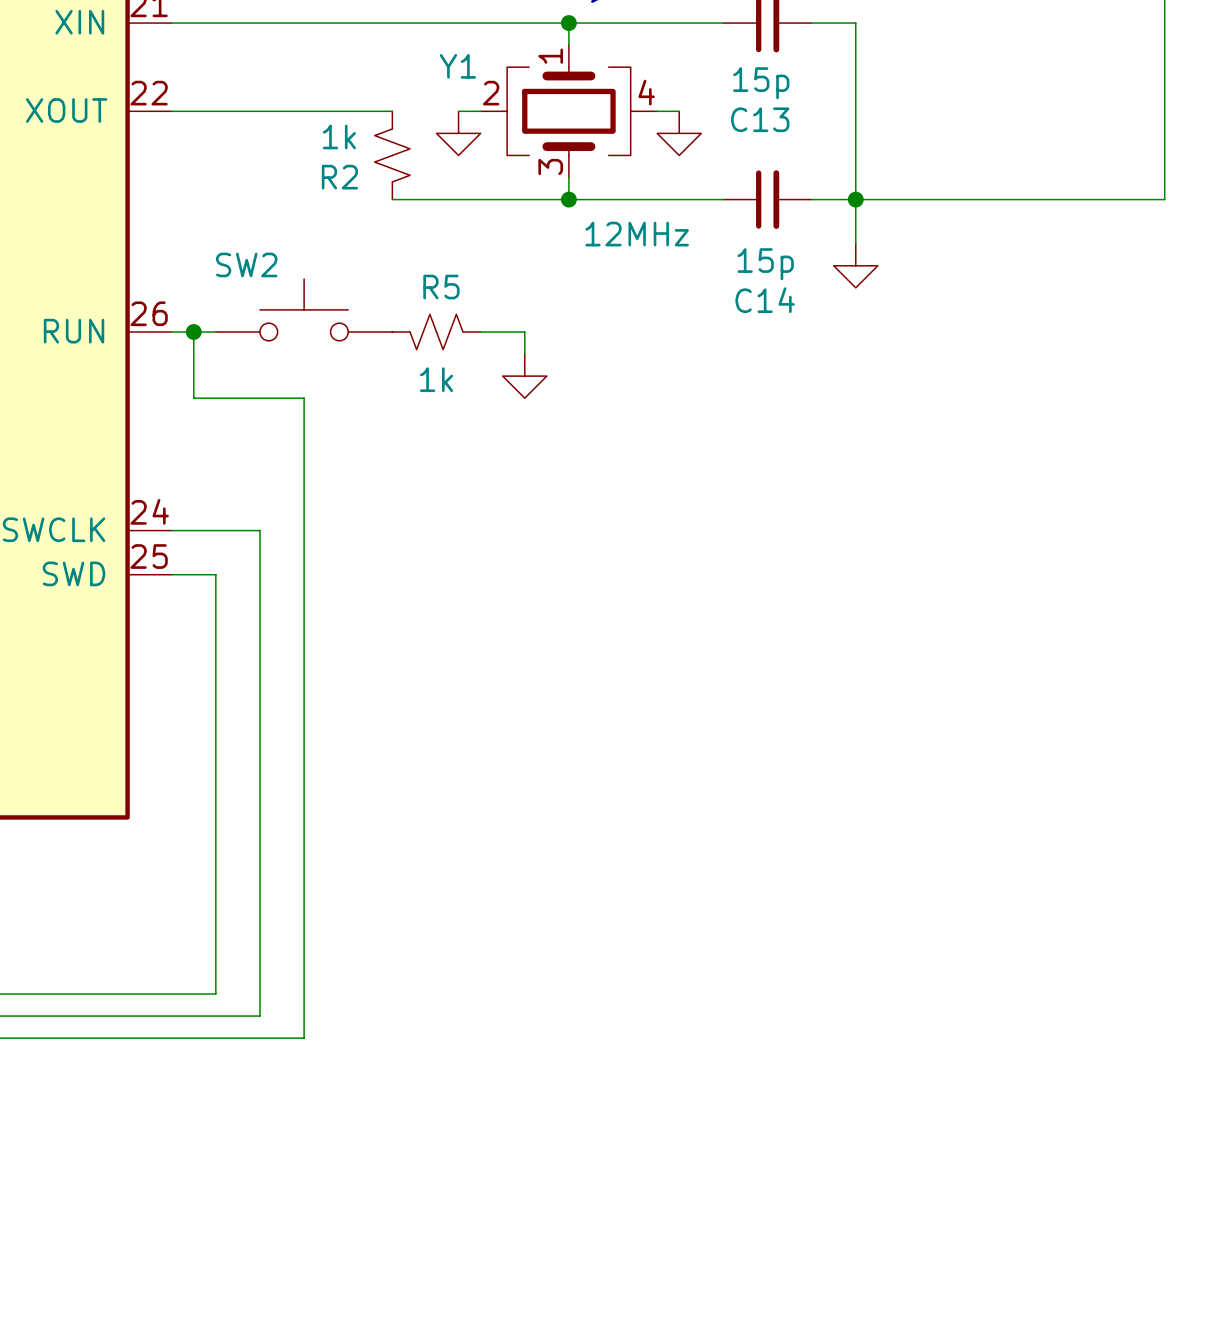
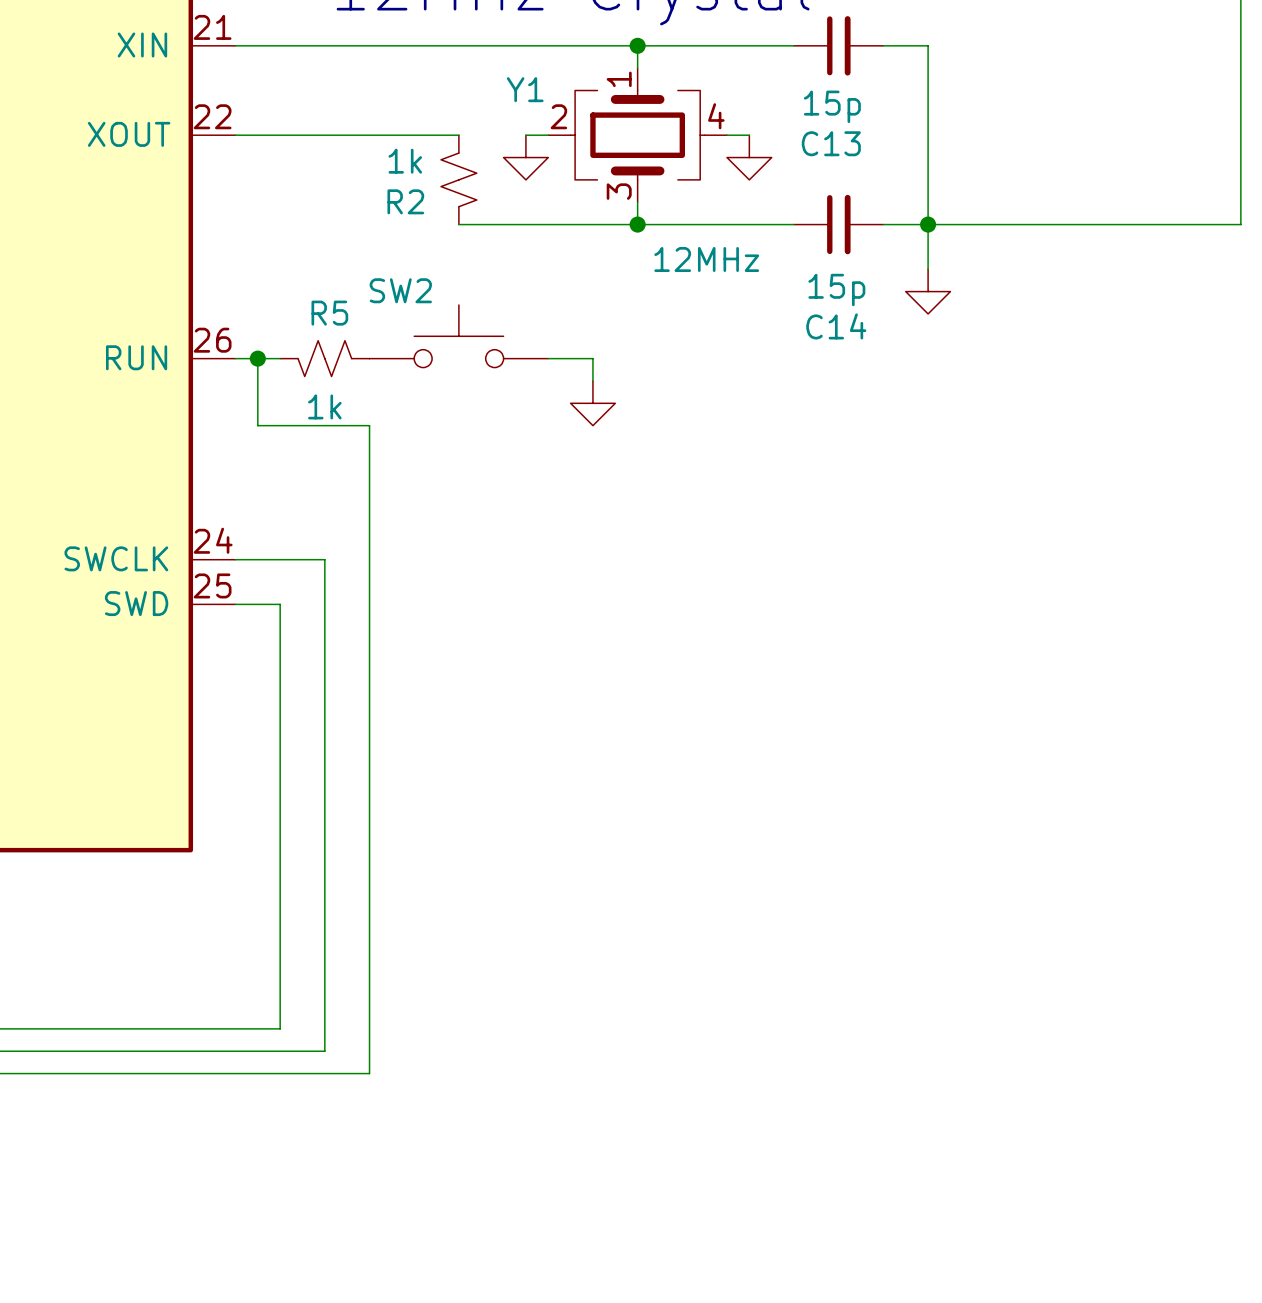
SW2 position: (304, 309) -> (458, 336)
R5 position: (436, 331) -> (324, 358)

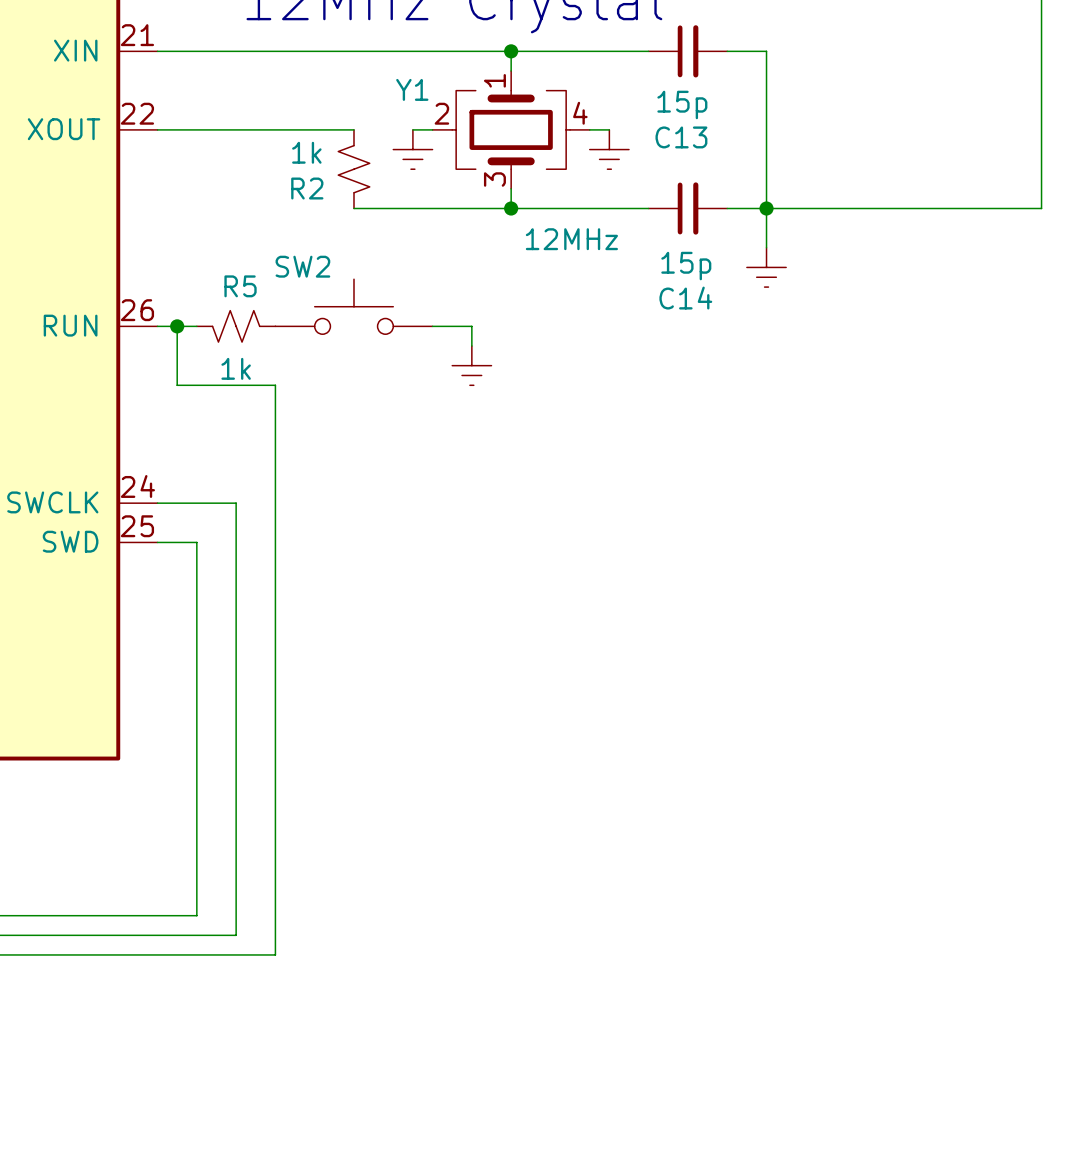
power symbol shape: [503, 135, 549, 180] -> [393, 129, 433, 170]
power symbol shape: [727, 135, 772, 180] -> [589, 129, 630, 170]
power symbol shape: [905, 269, 951, 314] -> [746, 247, 787, 288]
power symbol shape: [570, 380, 616, 426] -> [452, 346, 492, 386]

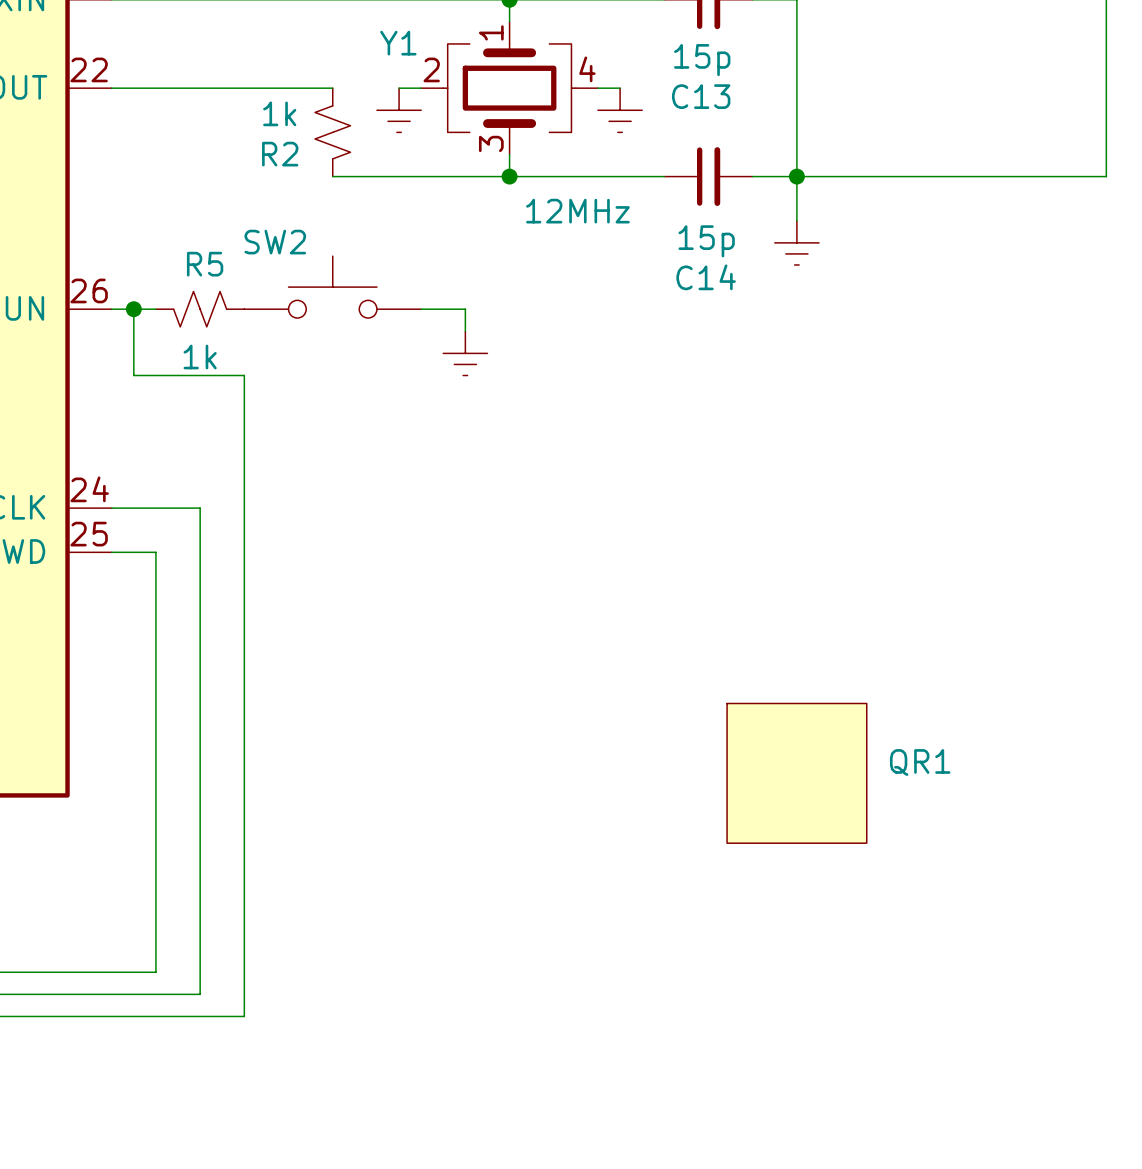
QR1: none -> (796, 773)

